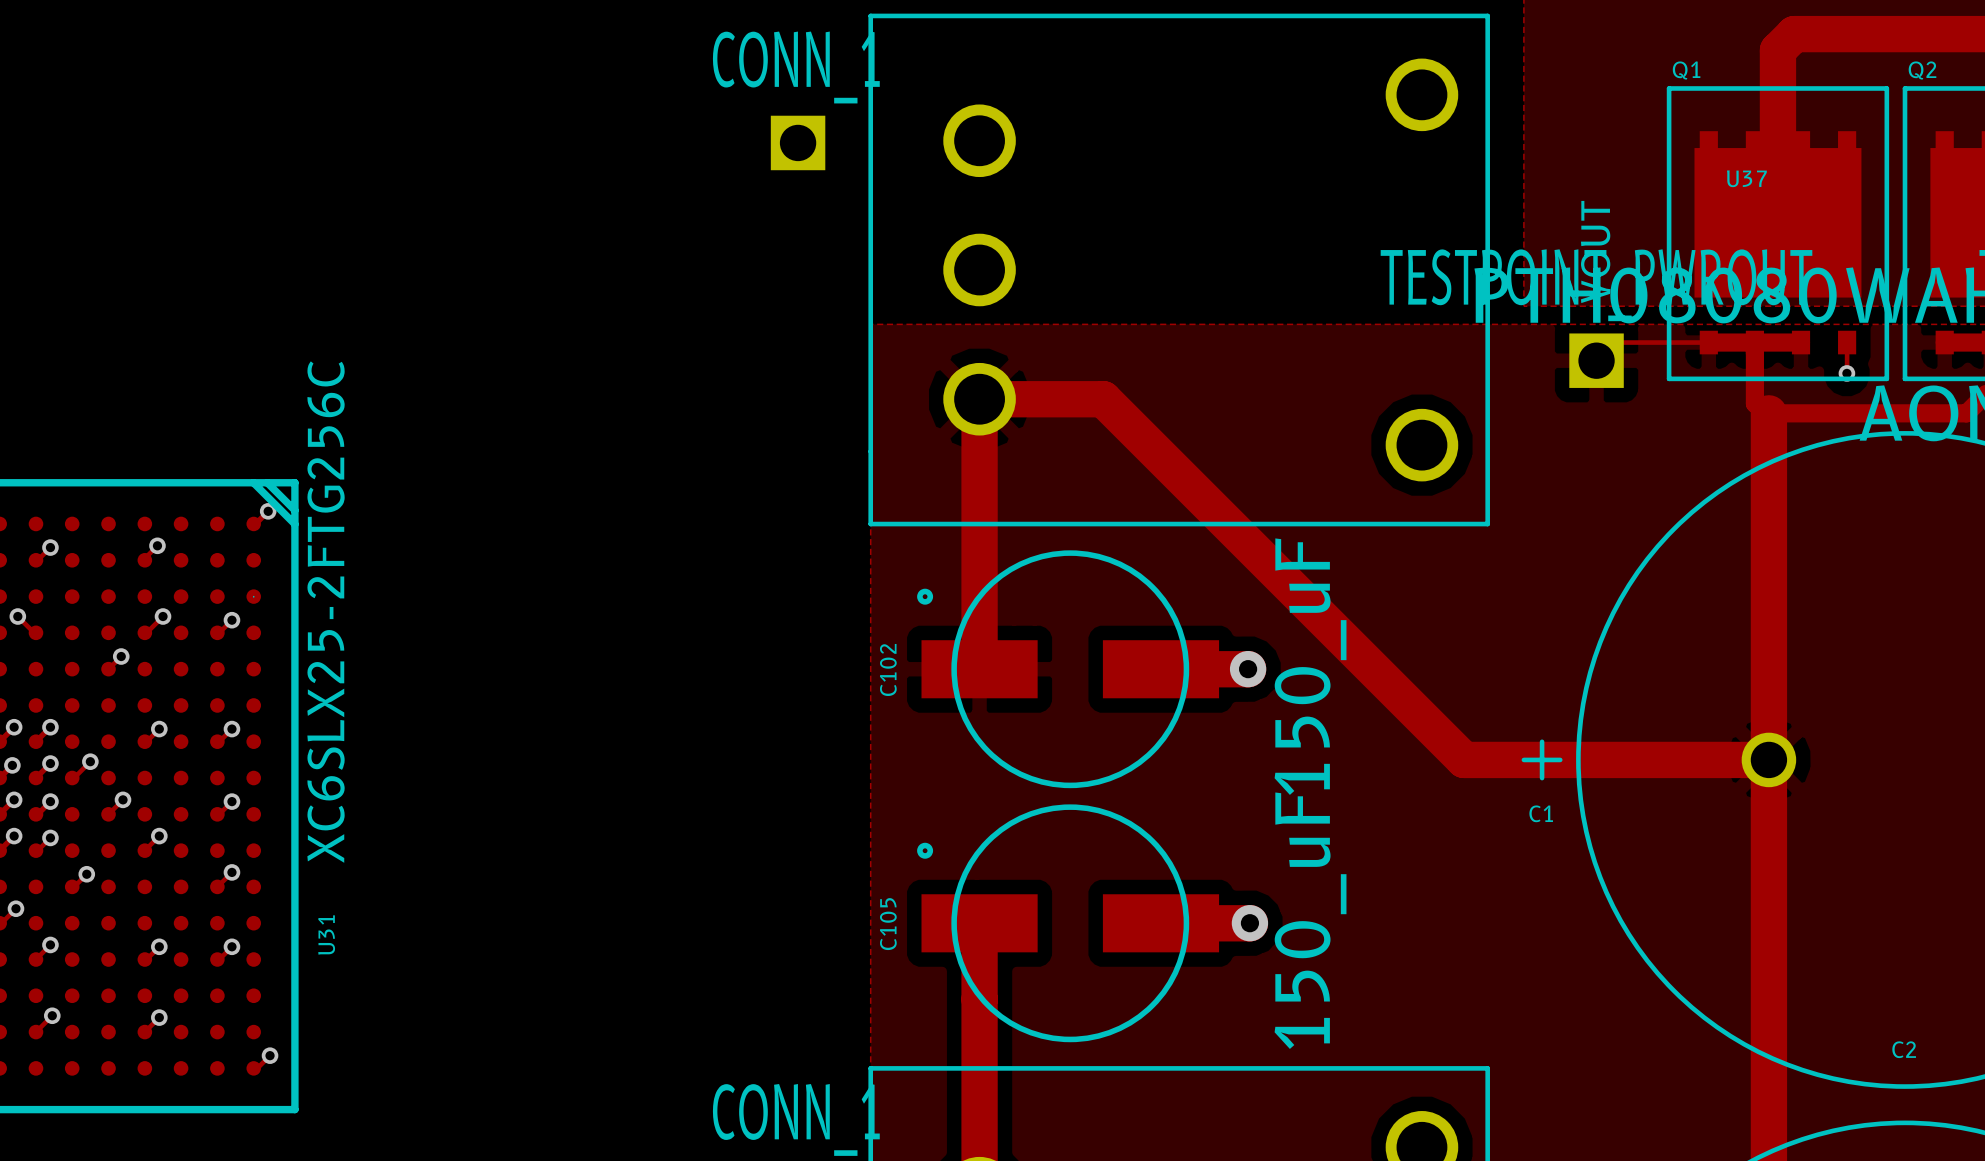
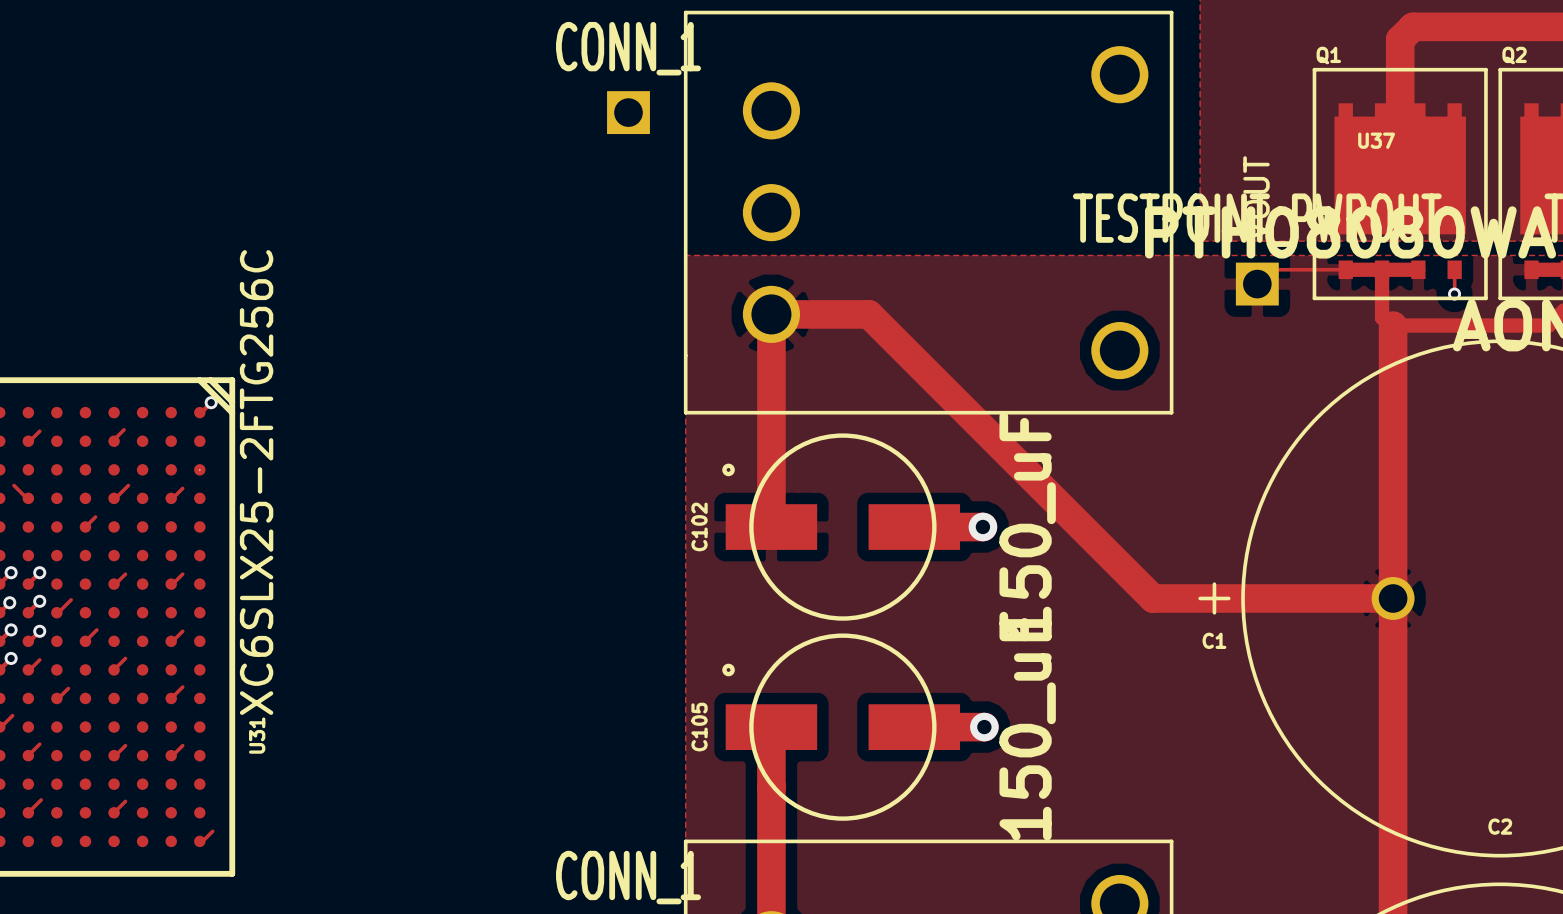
via: (157, 545) -> none
via: (50, 547) -> none
via: (17, 616) -> none
via: (163, 616) -> none
via: (231, 620) -> none
via: (121, 656) -> none
via: (159, 729) -> none
via: (231, 729) -> none
via: (90, 761) -> none
via: (123, 799) -> none
via: (231, 801) -> none
via: (159, 836) -> none
via: (50, 837) -> none
via: (231, 872) -> none
via: (86, 874) -> none
via: (15, 908) -> none
via: (50, 944) -> none
via: (159, 946) -> none
via: (231, 946) -> none
via: (52, 1015) -> none
via: (159, 1017) -> none
via: (270, 1055) -> none

